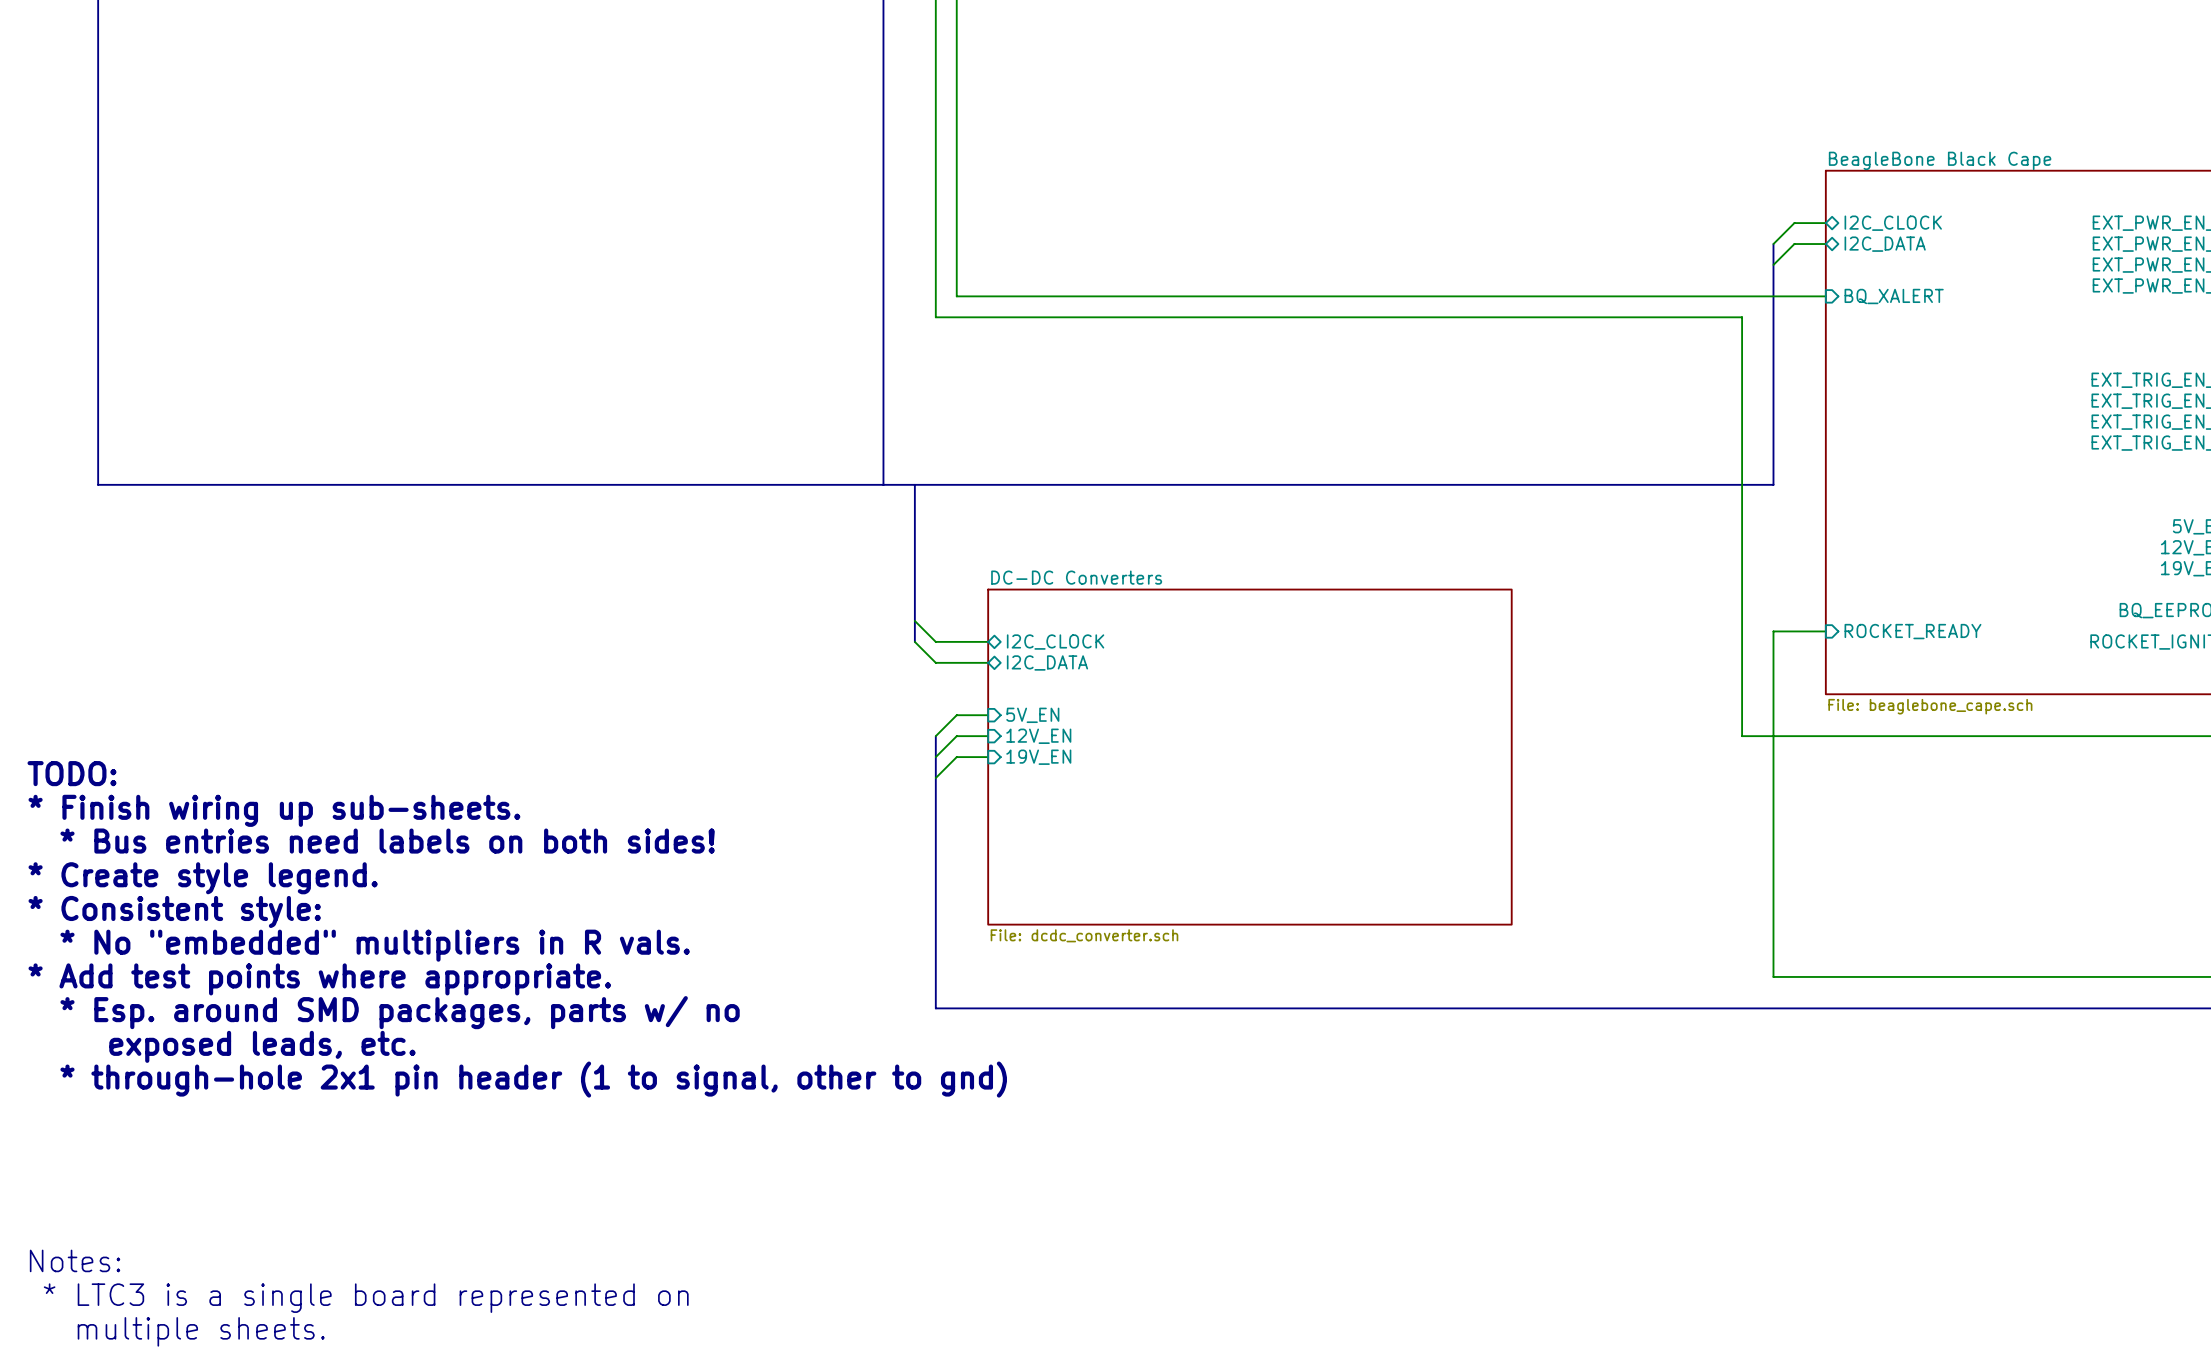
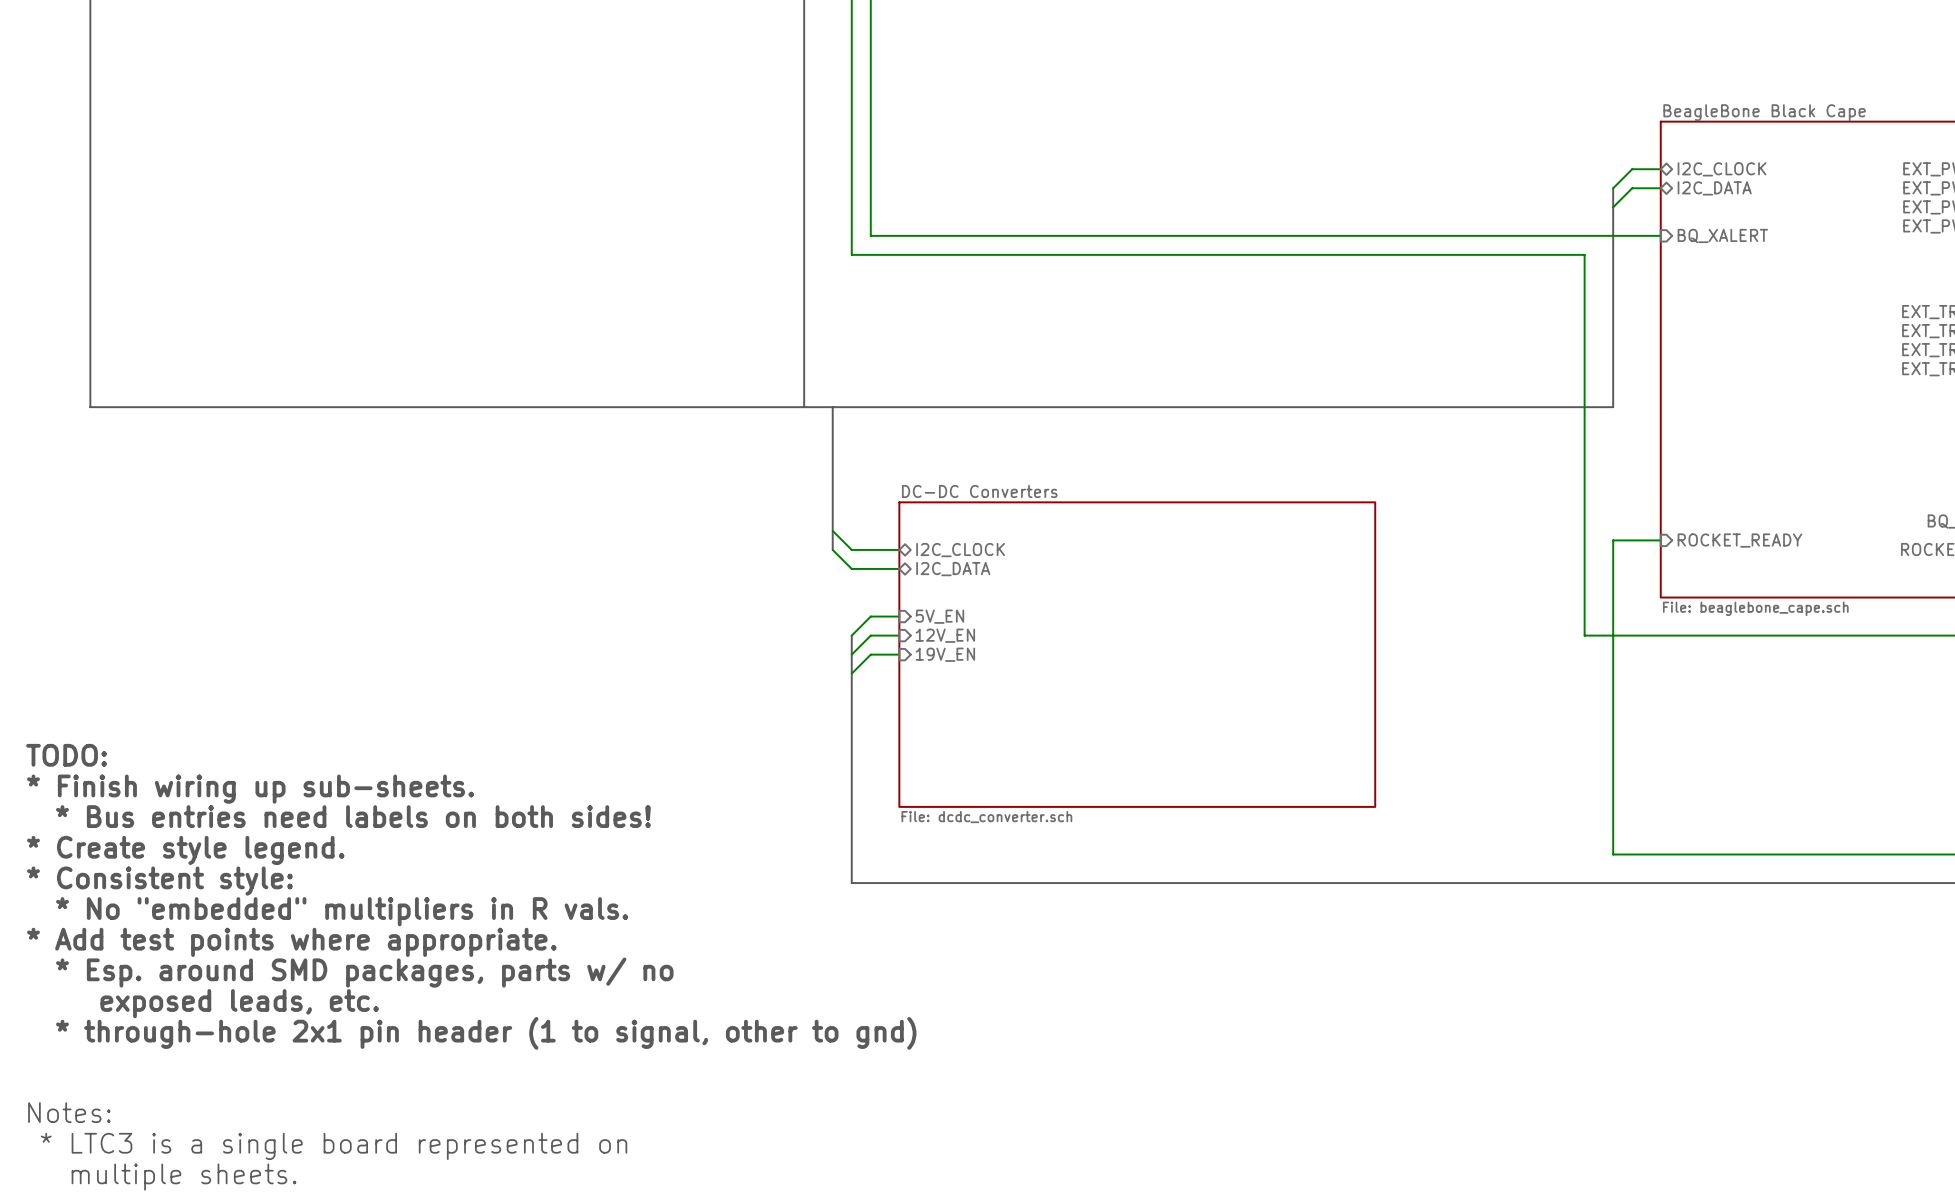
text position: TODO: (71, 773) -> TODO: (66, 755)
text position: * Finish wiring up sub-sheets. (274, 810) -> * Finish wiring up sub-sheets. (250, 789)
text position: * Bus entries need labels on both sides! (387, 841) -> * Bus entries need labels on both sides! (353, 816)
text position: * Create style legend. (203, 878) -> * Create style legend. (185, 850)
text position: * Consistent style: (174, 911) -> * Consistent style: (159, 881)
text position: * No "embedded" multipliers in R vals. (375, 945) -> * No "embedded" multipliers in R vals. (342, 911)
text position: * Add test points where appropriate. (319, 979) -> * Add test points where appropriate. (291, 942)
text position: * Esp. around SMD packages, parts w/ no (400, 1012) -> * Esp. around SMD packages, parts w/ no (364, 972)
text position: exposed leads, etc. (262, 1046) -> exposed leads, etc. (239, 1003)
text position: * through-hole 2x1 pin header (1 to signal, other to gnd) (533, 1079) -> * through-hole 2x1 pin header (1 to signal, other to gnd) (486, 1033)

